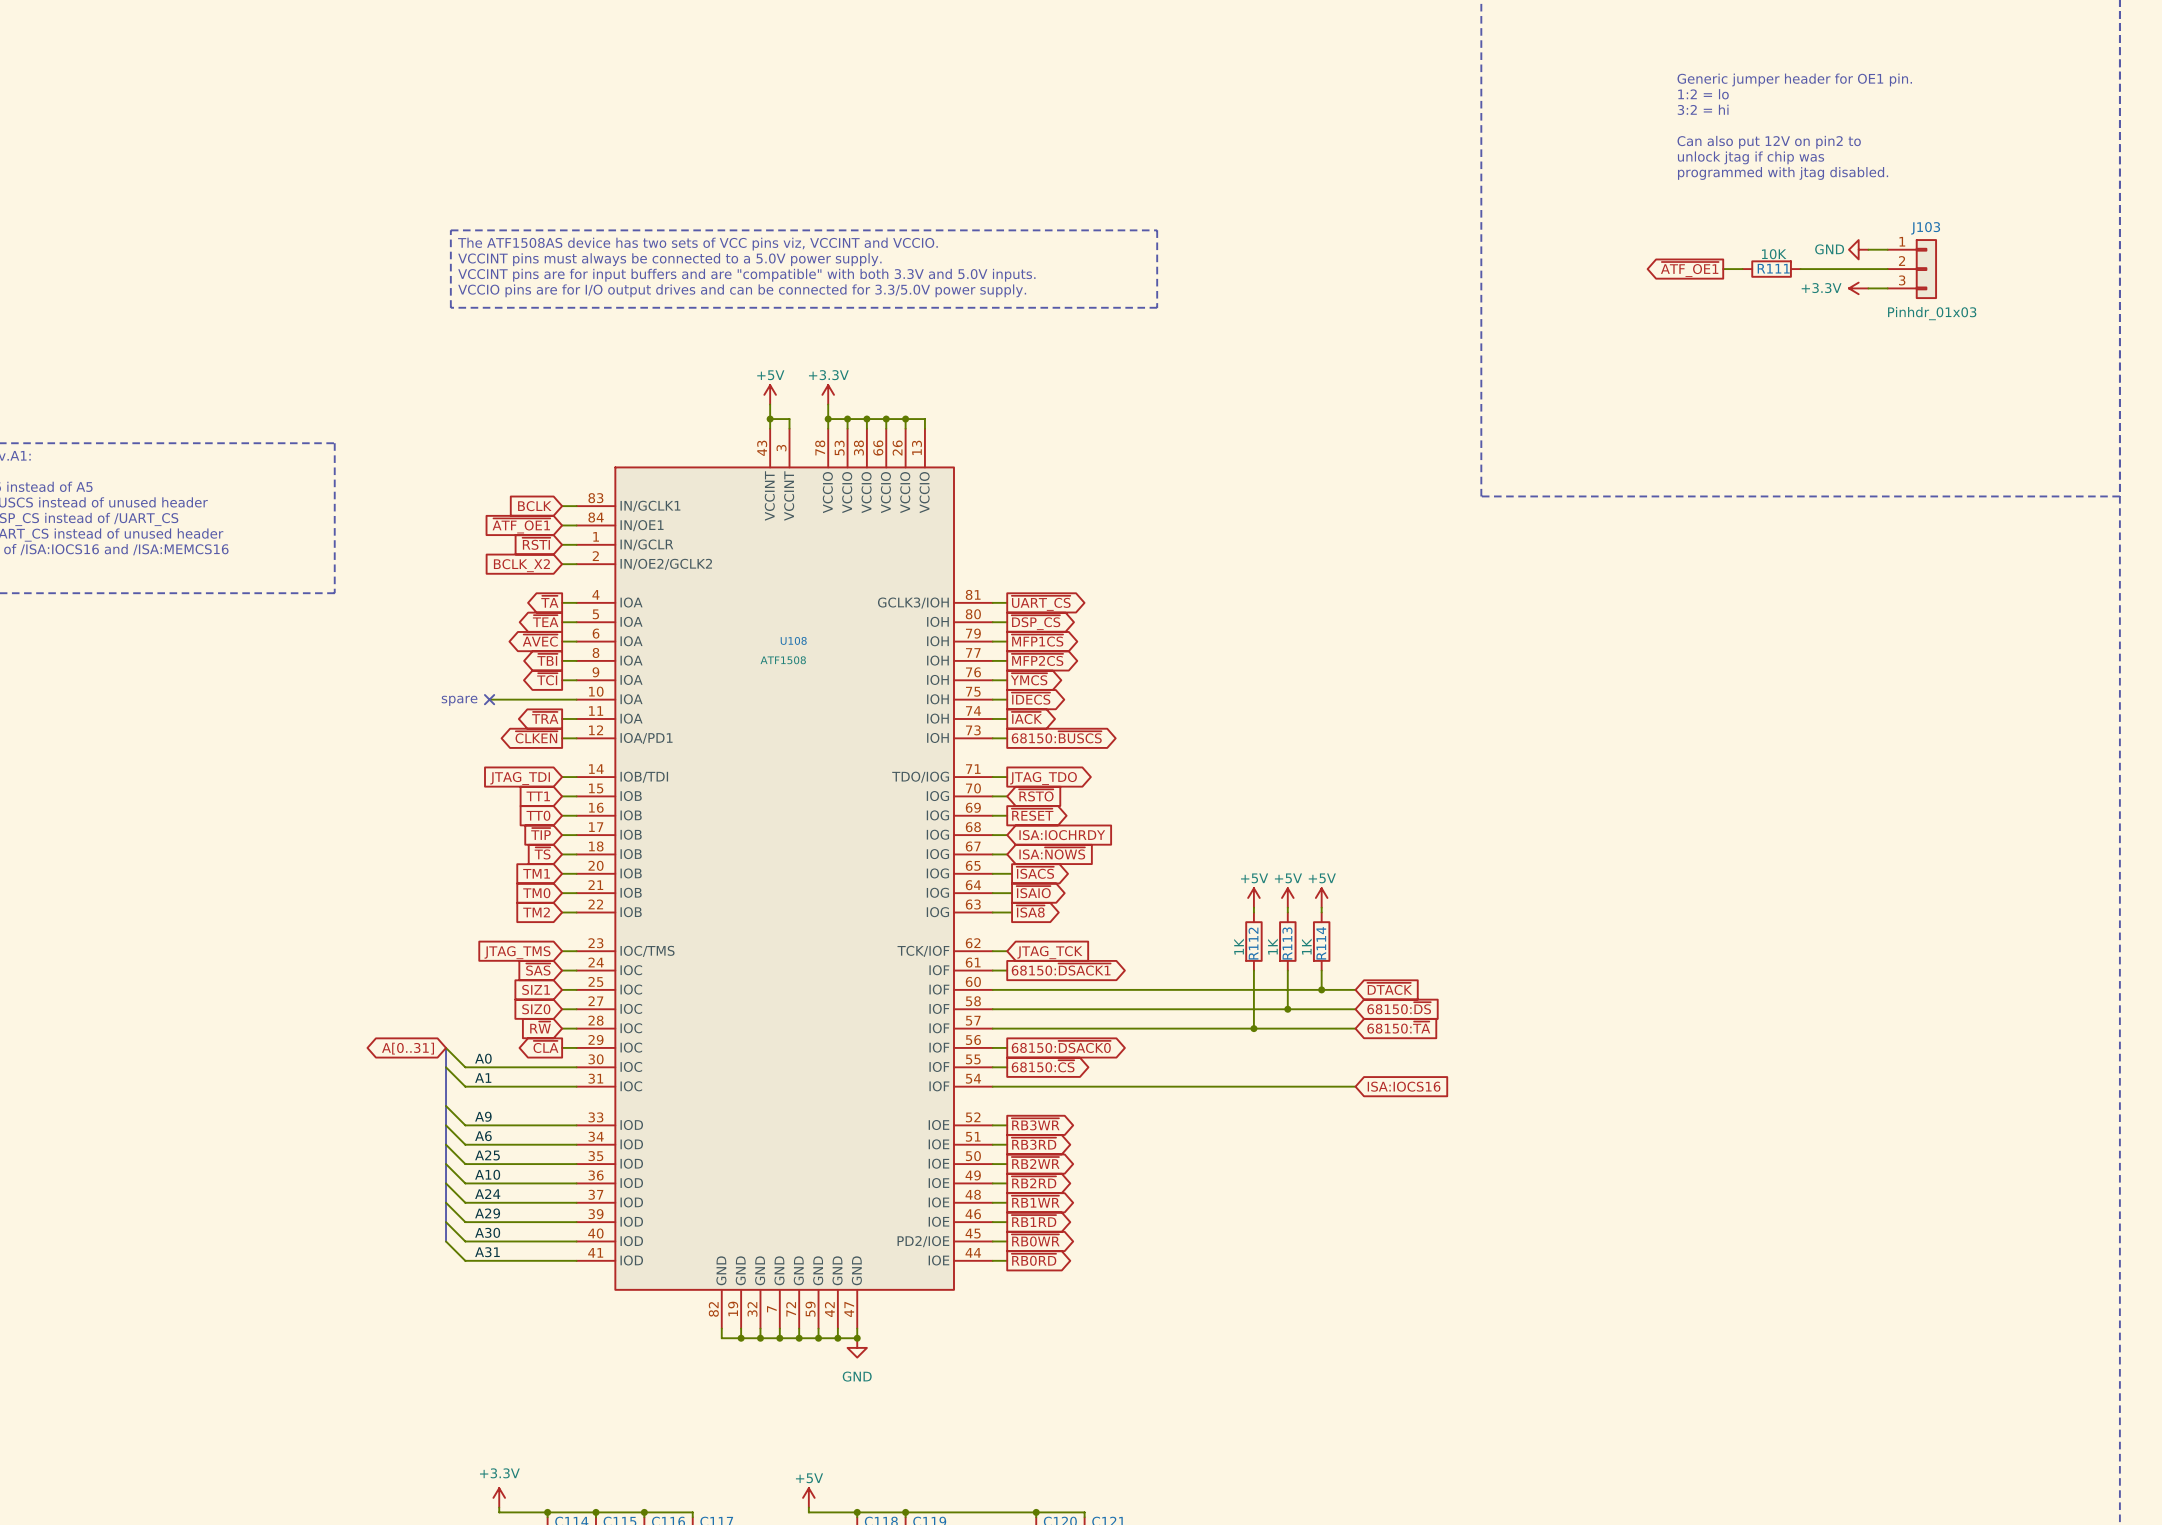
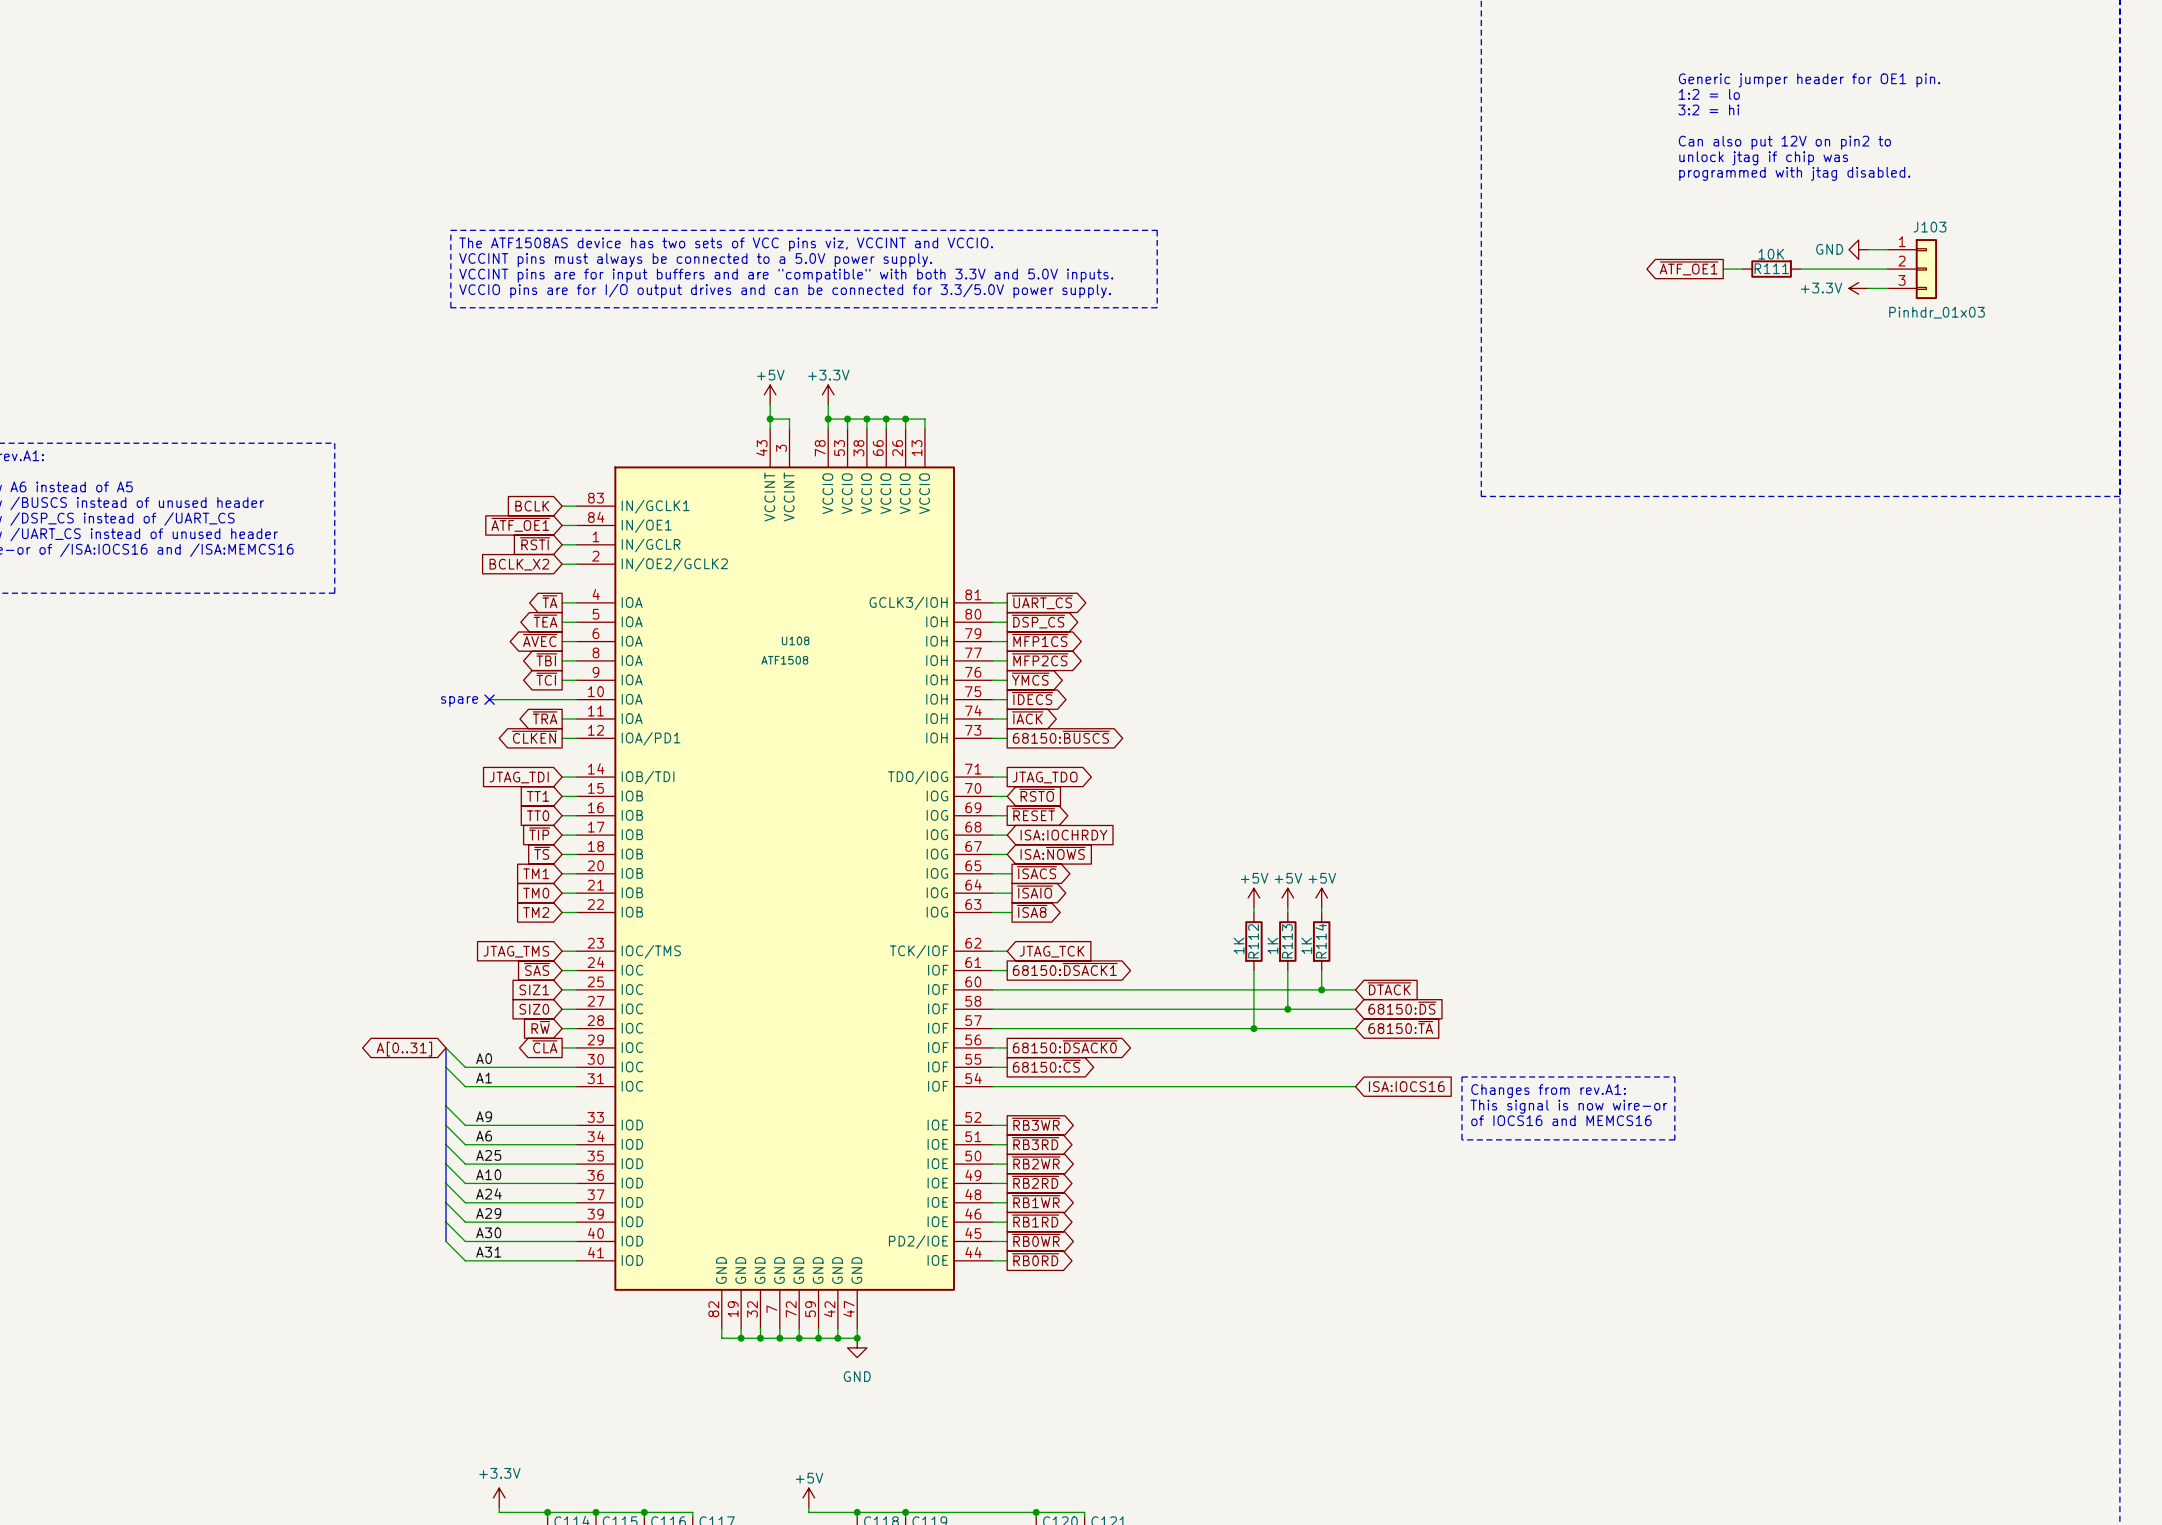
line: none -> (1461, 1076) (1674, 1076) (1674, 1139) (1461, 1139) (1461, 1076)
text: none -> Changes from rev.A1: (1548, 1091)
text: none -> This signal is now wire-or (1568, 1106)
text: none -> of IOCS16 and MEMCS16 (1561, 1120)

